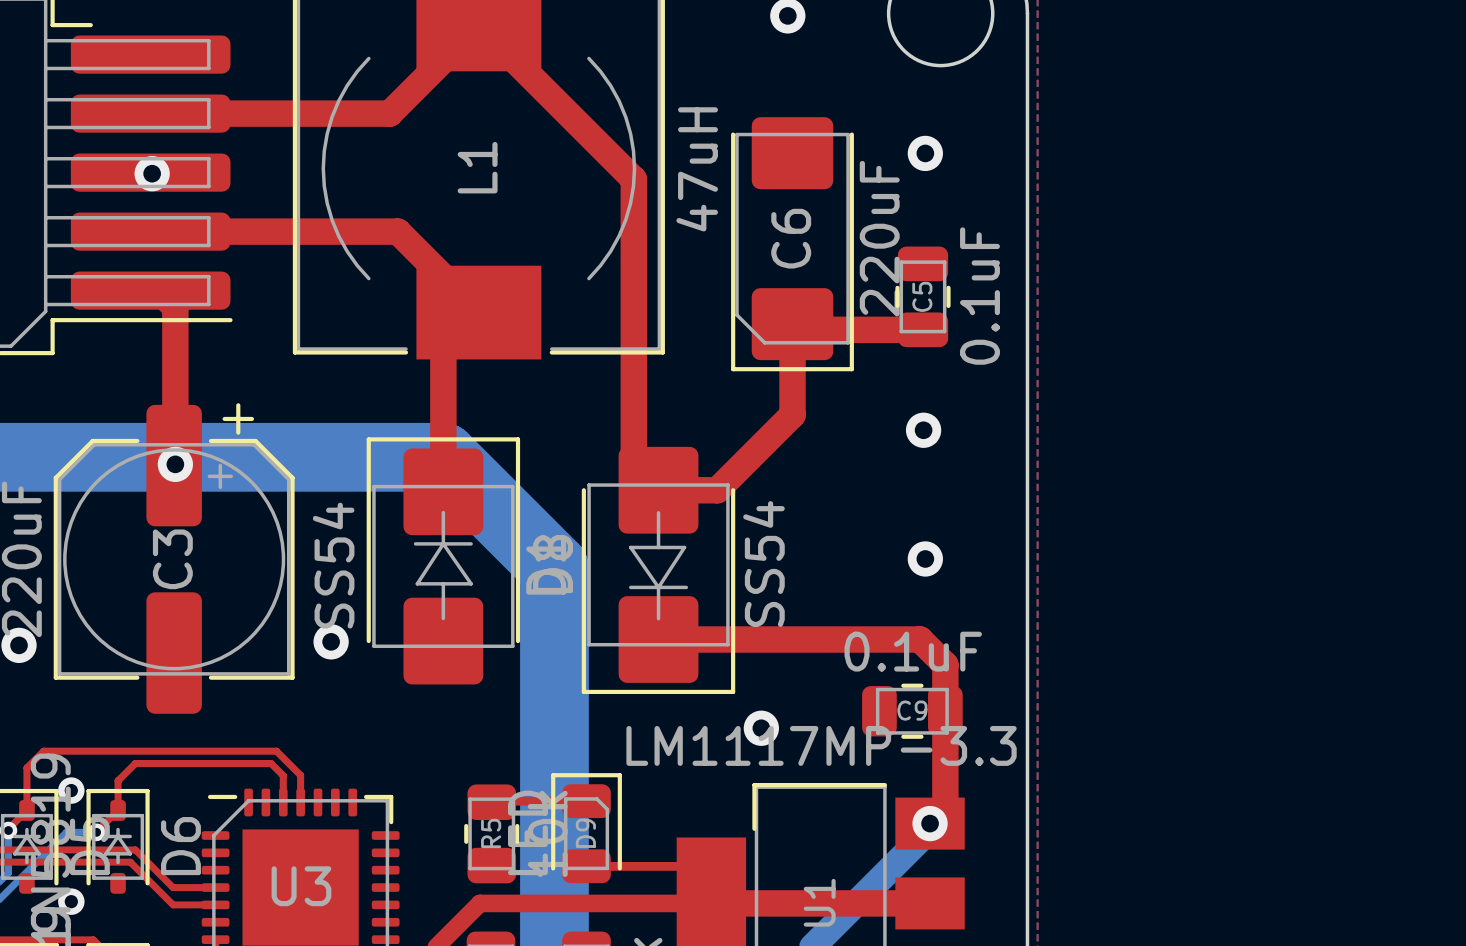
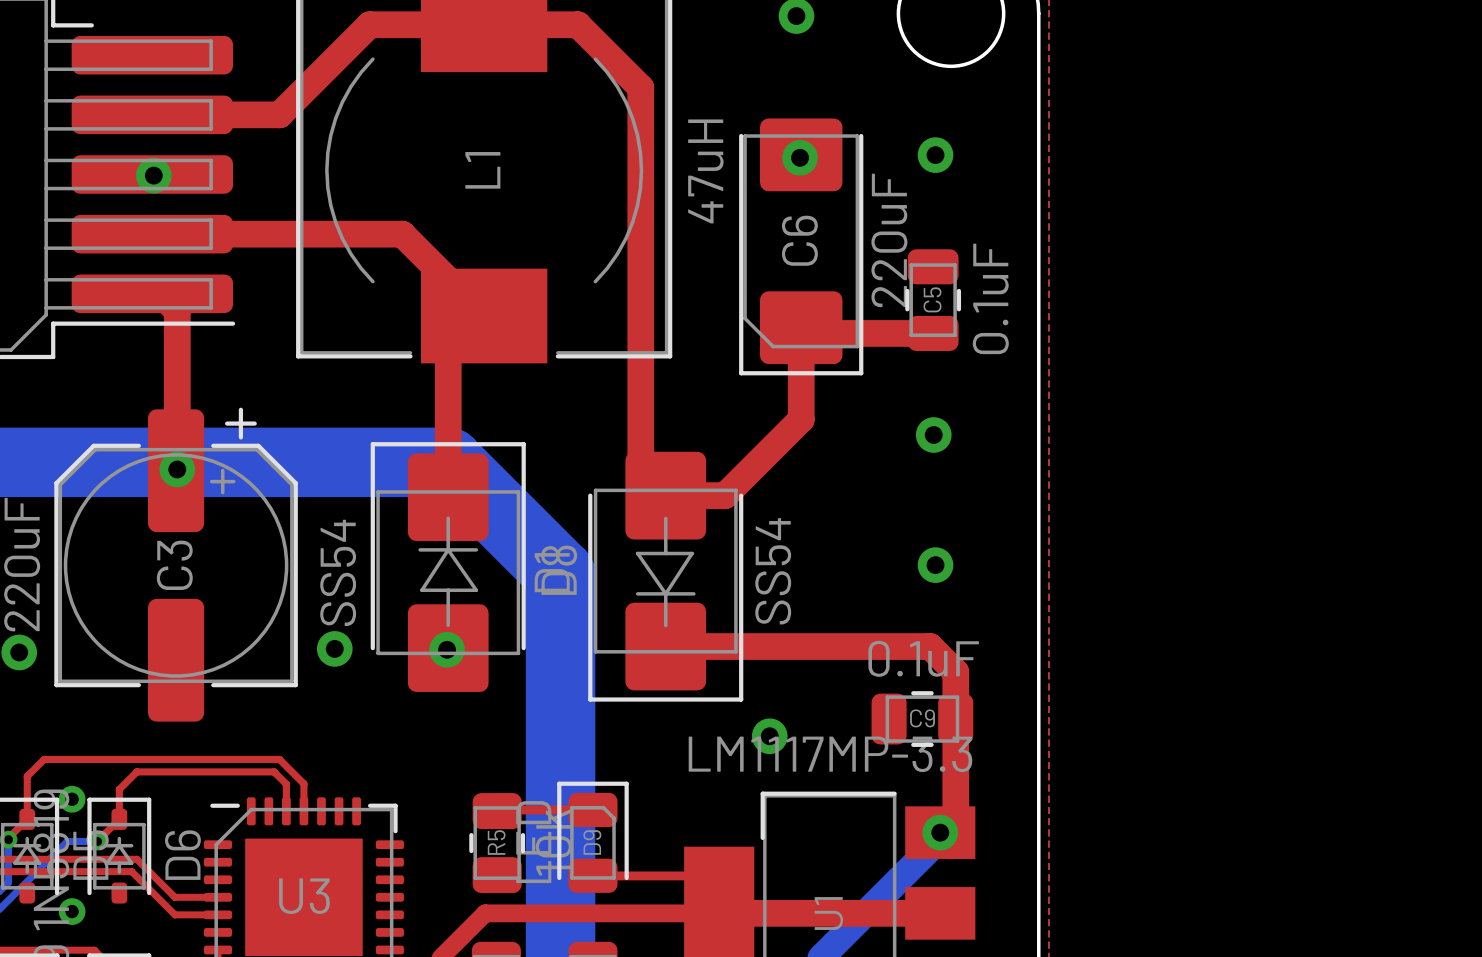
top track: (276, 113) (389, 113) (478, 24) (633, 179) -> (279, 114) (369, 24) (577, 24) (640, 87) (640, 181)
via: none -> (800, 157)
via: none -> (447, 649)

